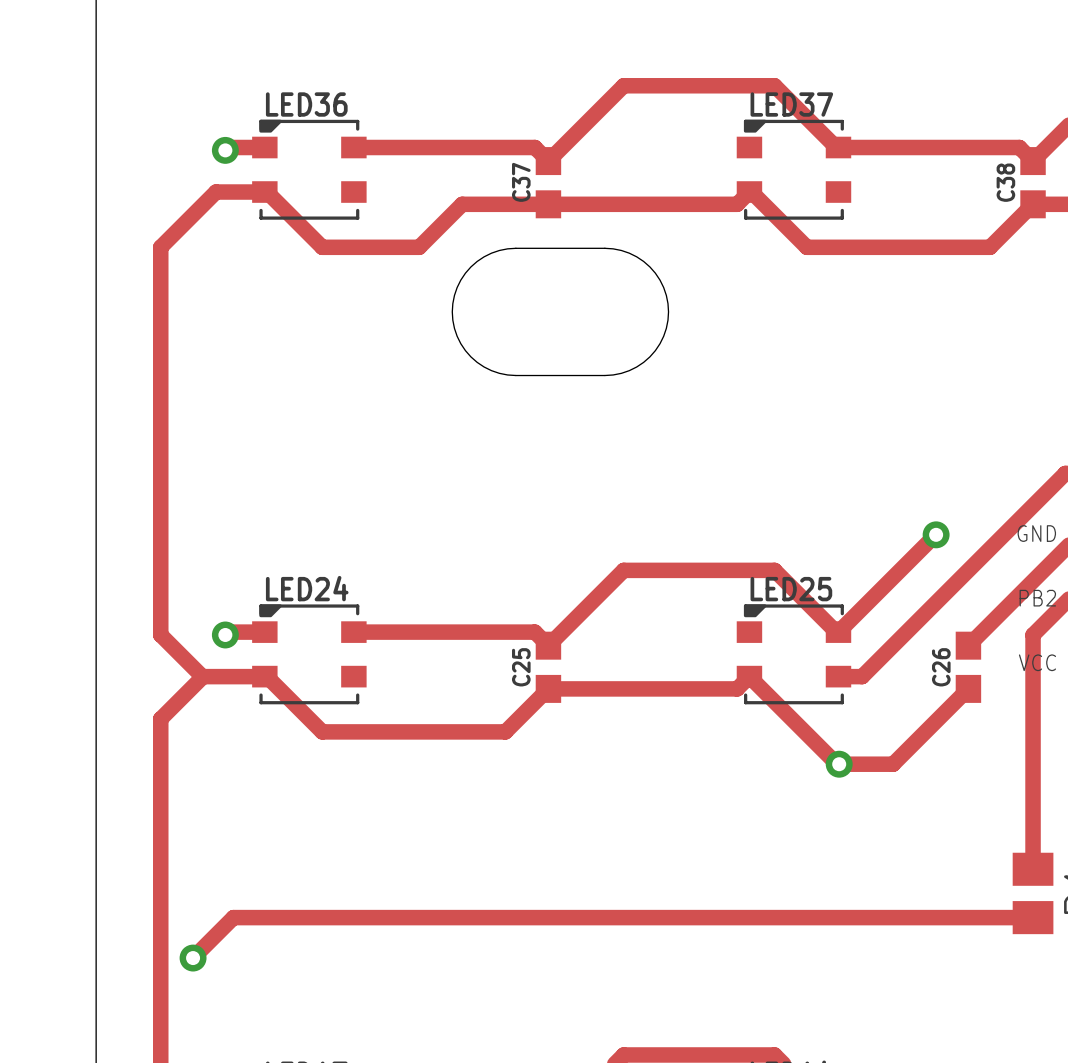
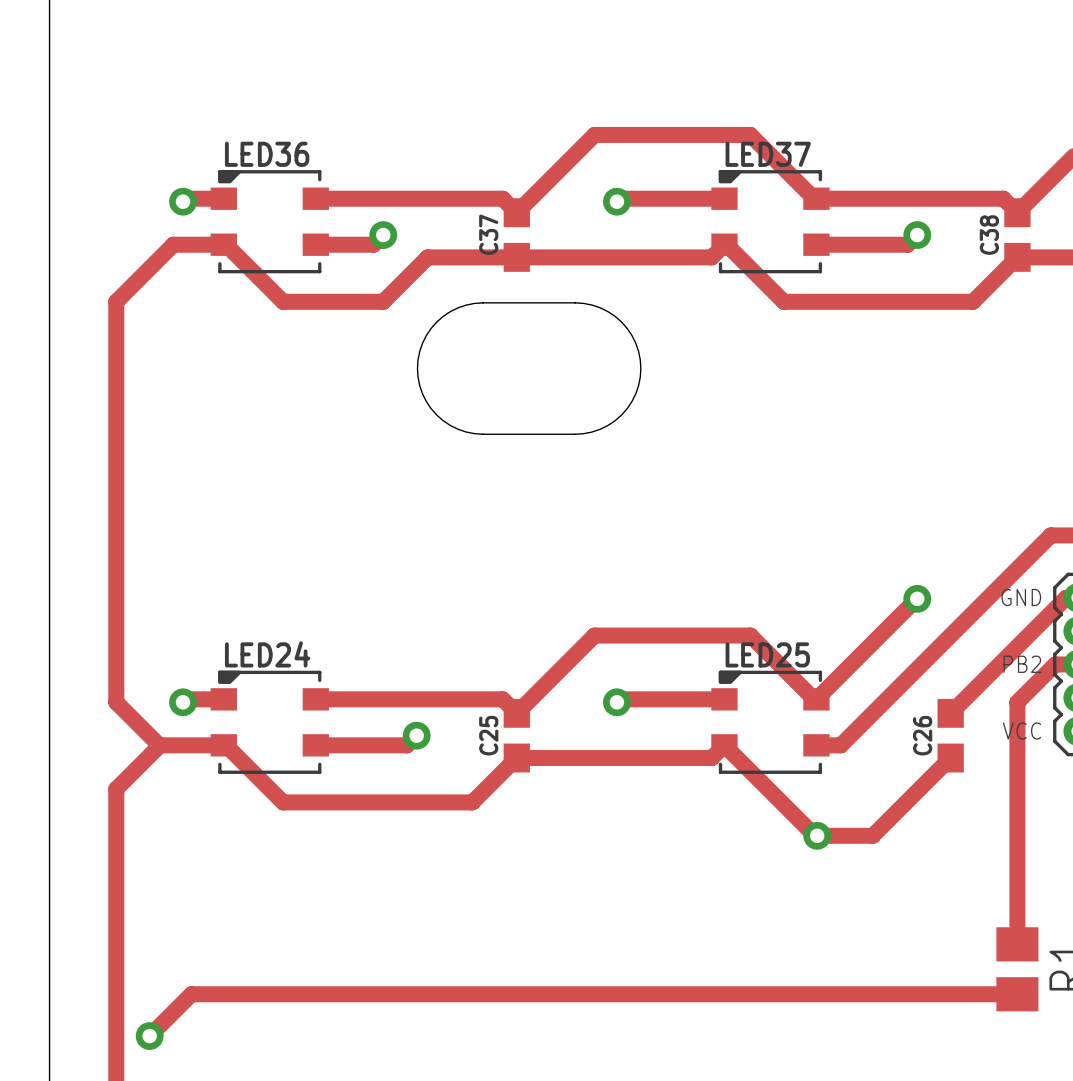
track: none -> (724, 198) (619, 198) (616, 201)
via: none -> (616, 201)
track: none -> (383, 235) (373, 244) (315, 244)
via: none -> (383, 235)
track: none -> (917, 235) (907, 244) (816, 244)
via: none -> (917, 235)
track: none -> (724, 699) (619, 699) (616, 702)
via: none -> (616, 702)
track: none -> (416, 735) (407, 745) (315, 745)
via: none -> (416, 735)

